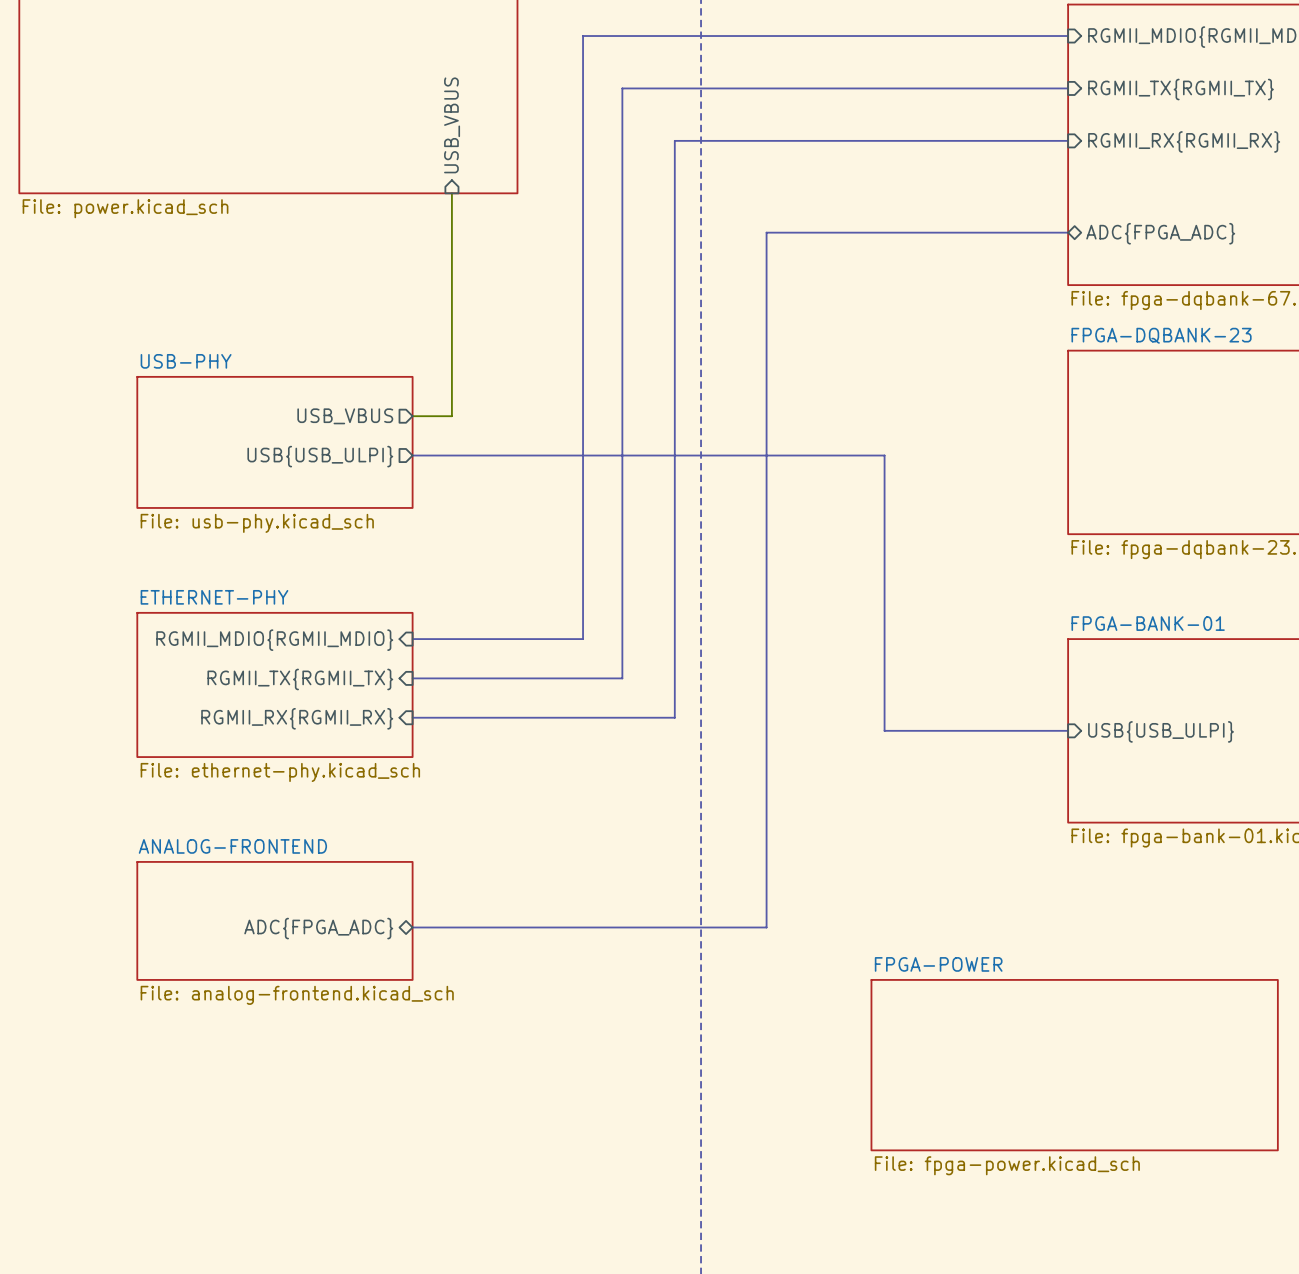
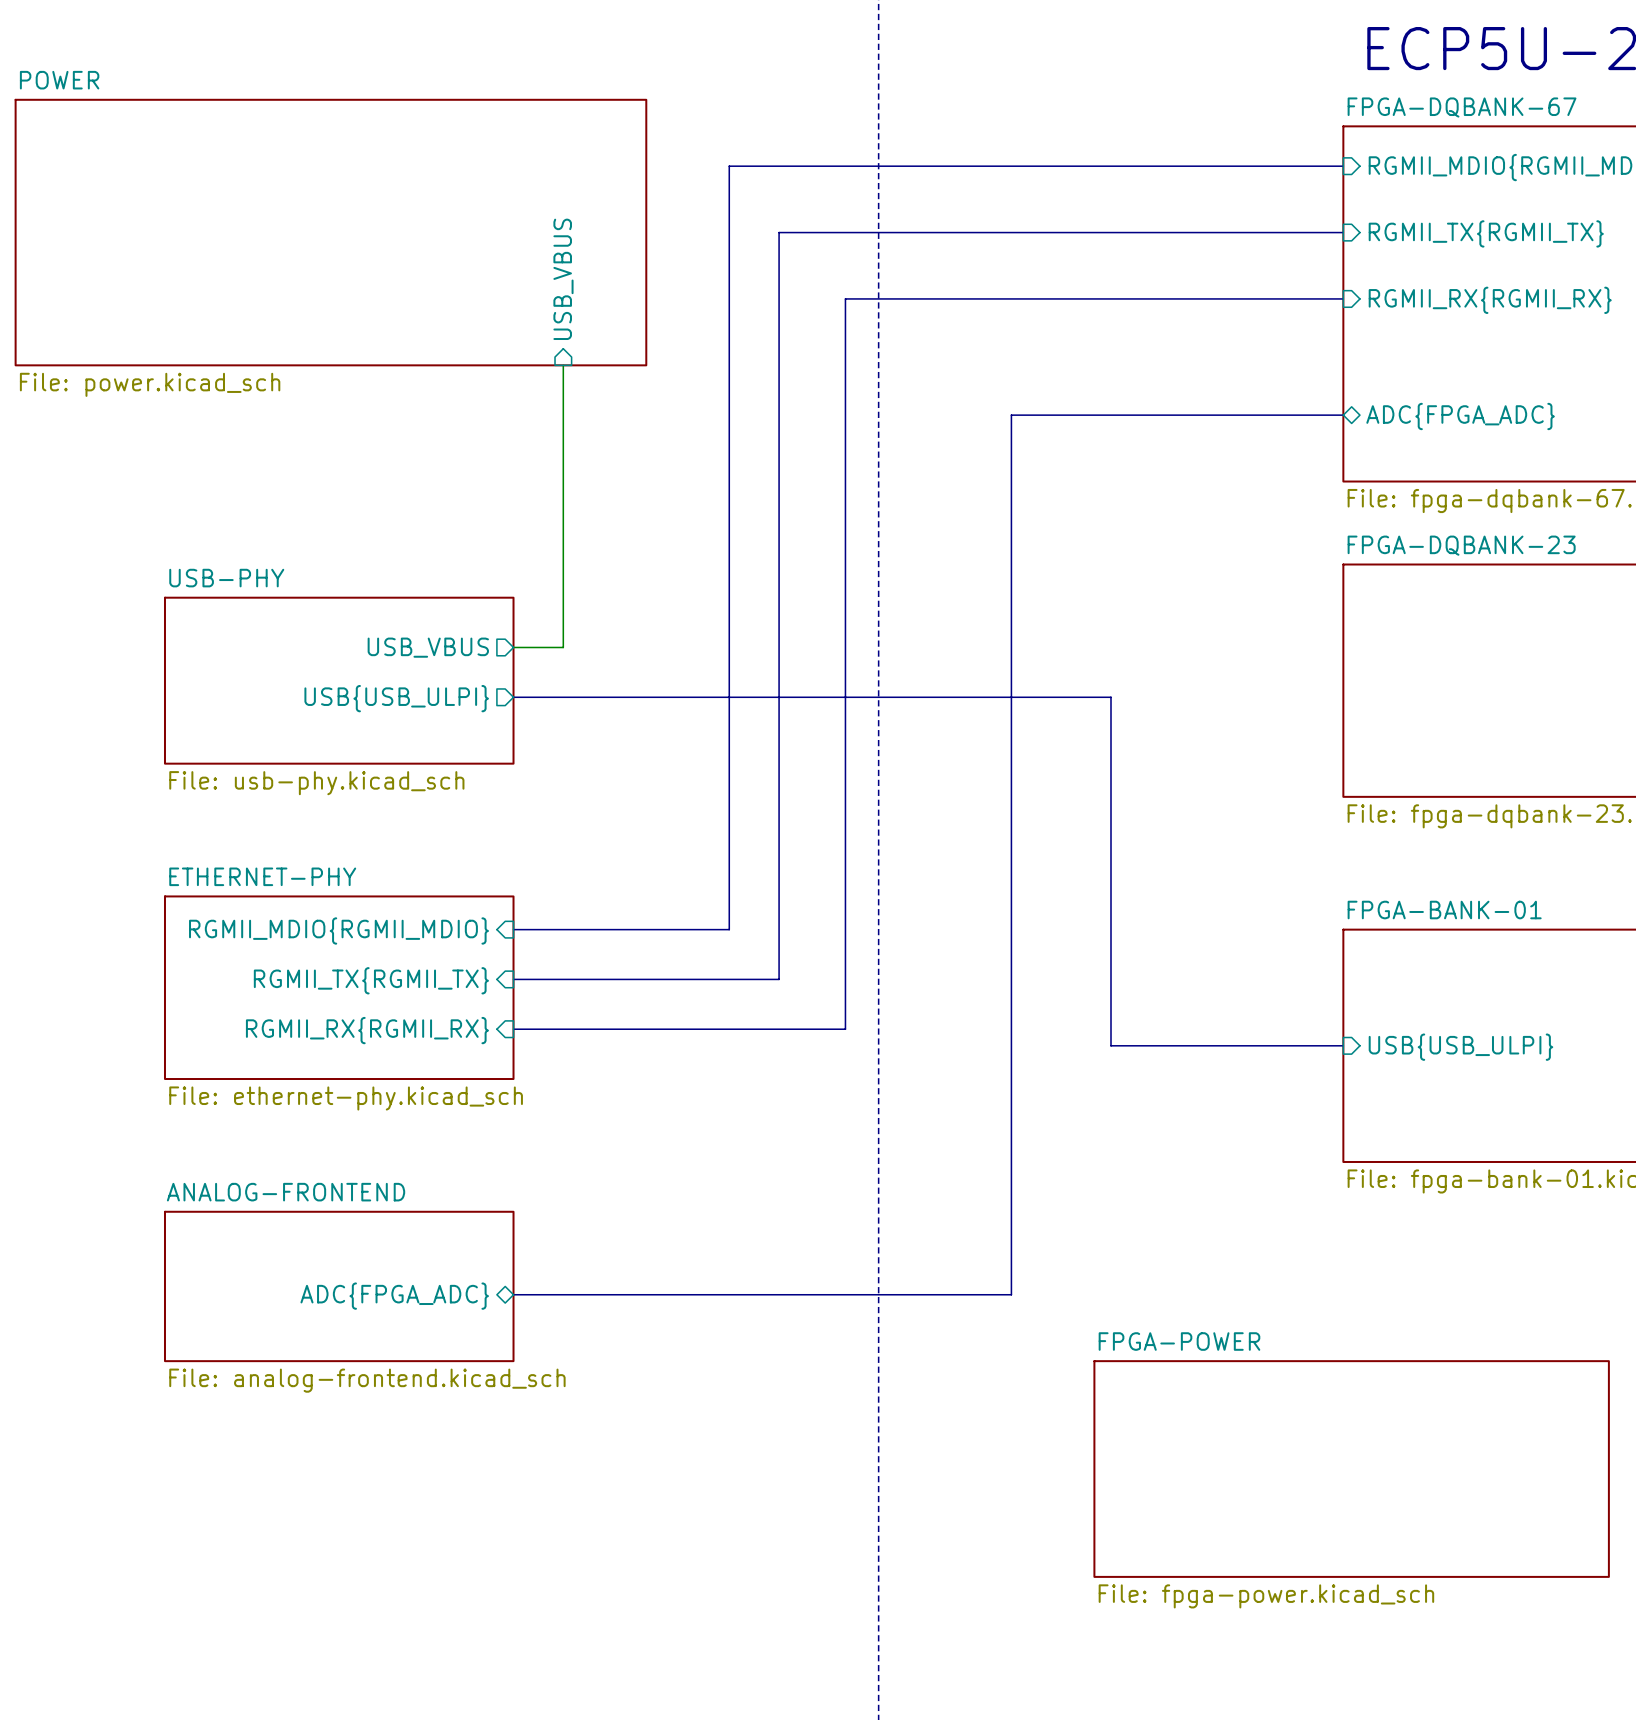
bus: (805, 232) (766, 232) (766, 927) -> (1011, 415) (1011, 1294) (961, 1294)

